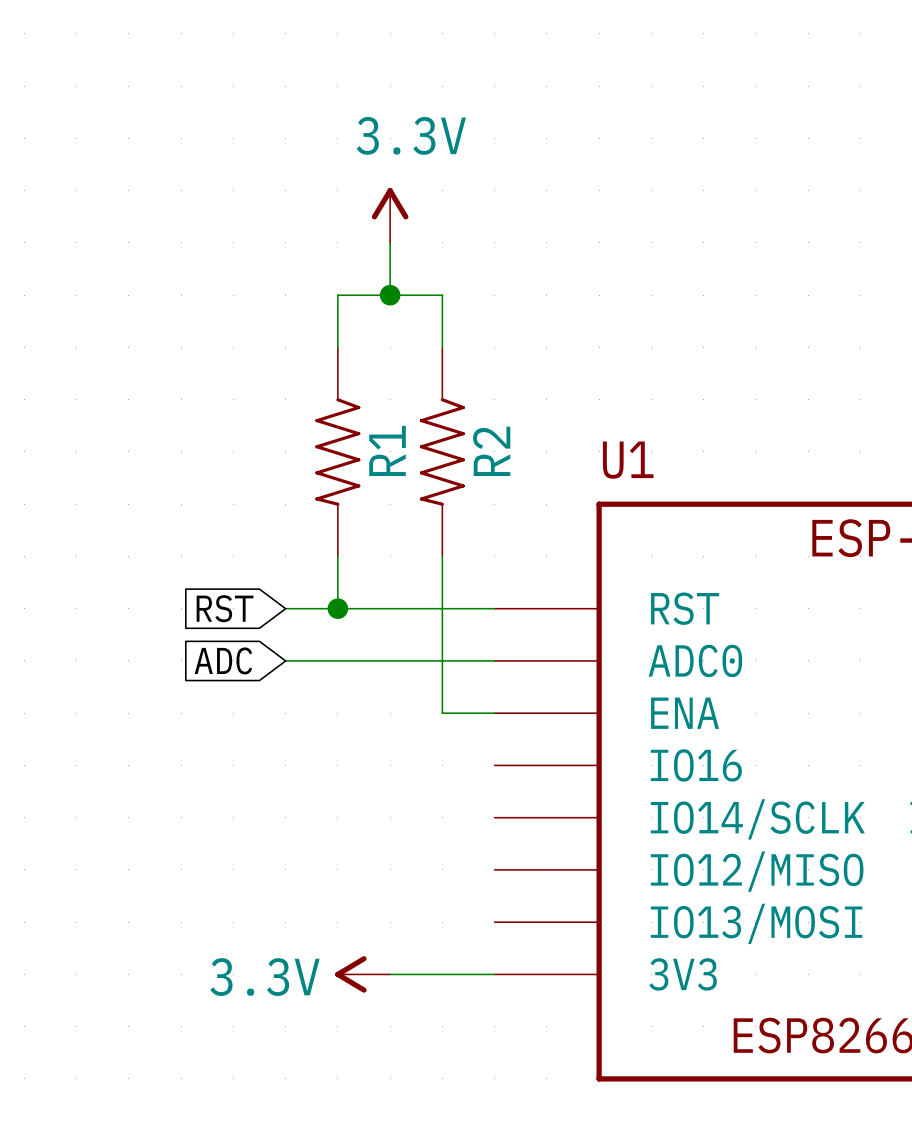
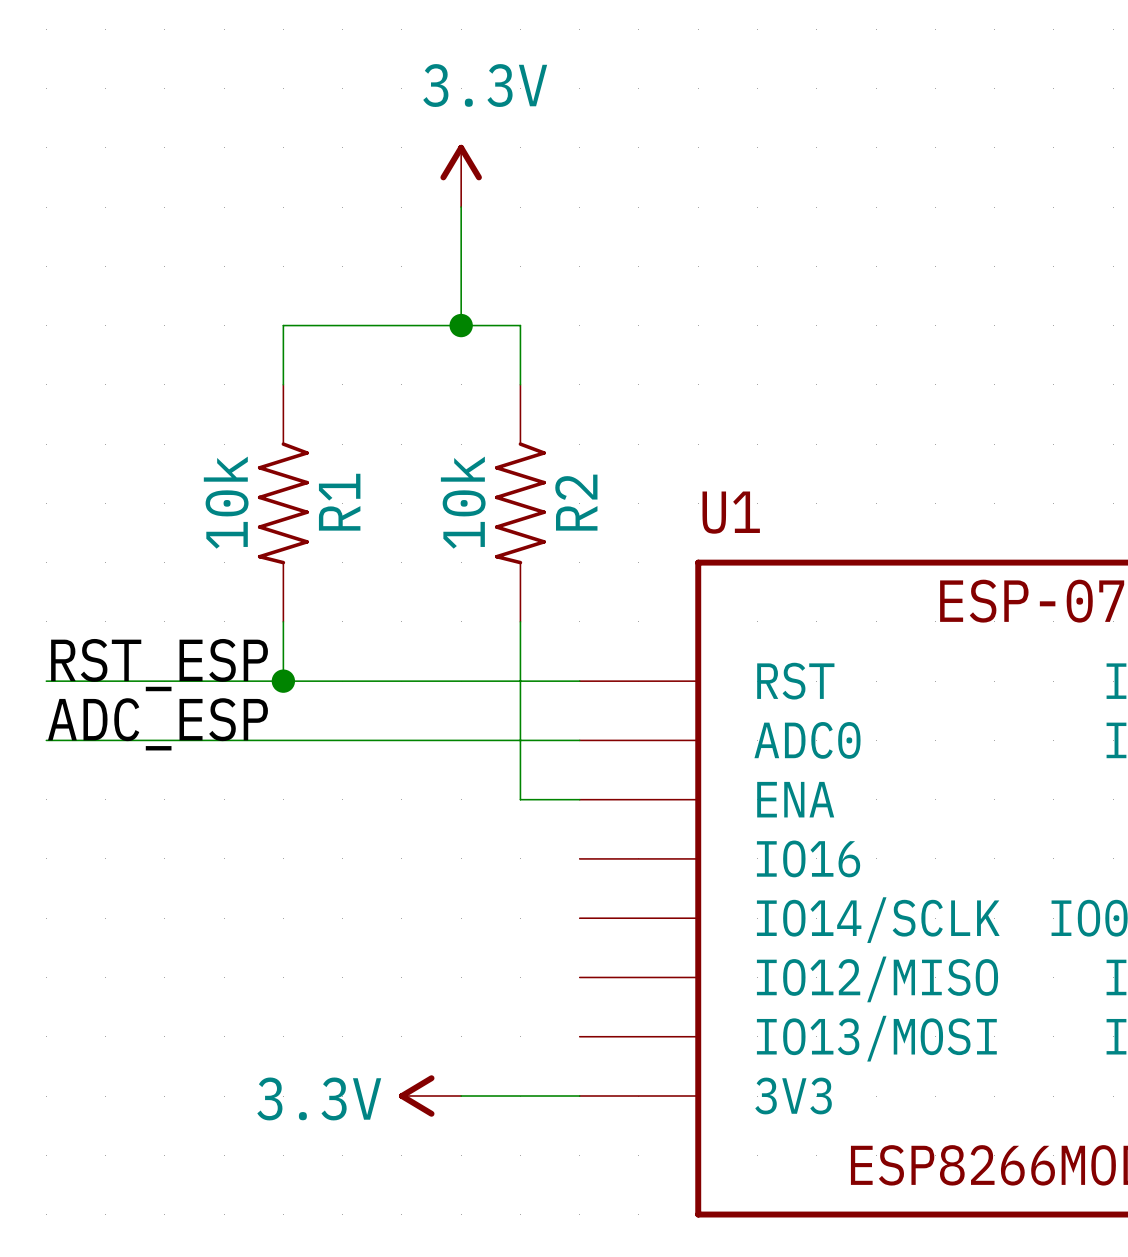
power symbol position: 3.3V (390, 215) -> 3.3V (461, 175)
wire: (337, 295) (337, 347) -> (401, 325) (283, 325) (283, 384)
R1 value: none -> 10k (226, 502)
R1 position: (337, 451) -> (283, 503)
R2 value: none -> 10k (463, 502)
wire: (337, 556) (337, 608) -> (283, 621) (283, 681)
label: none -> RST_ESP (159, 665)
wire: none -> (46, 681) (342, 681)
global label: RST (225, 608) -> none
junction position: (337, 608) -> (283, 681)
label: none -> ADC_ESP (157, 724)
wire: none -> (46, 740) (342, 740)
global label: ADC (223, 660) -> none

